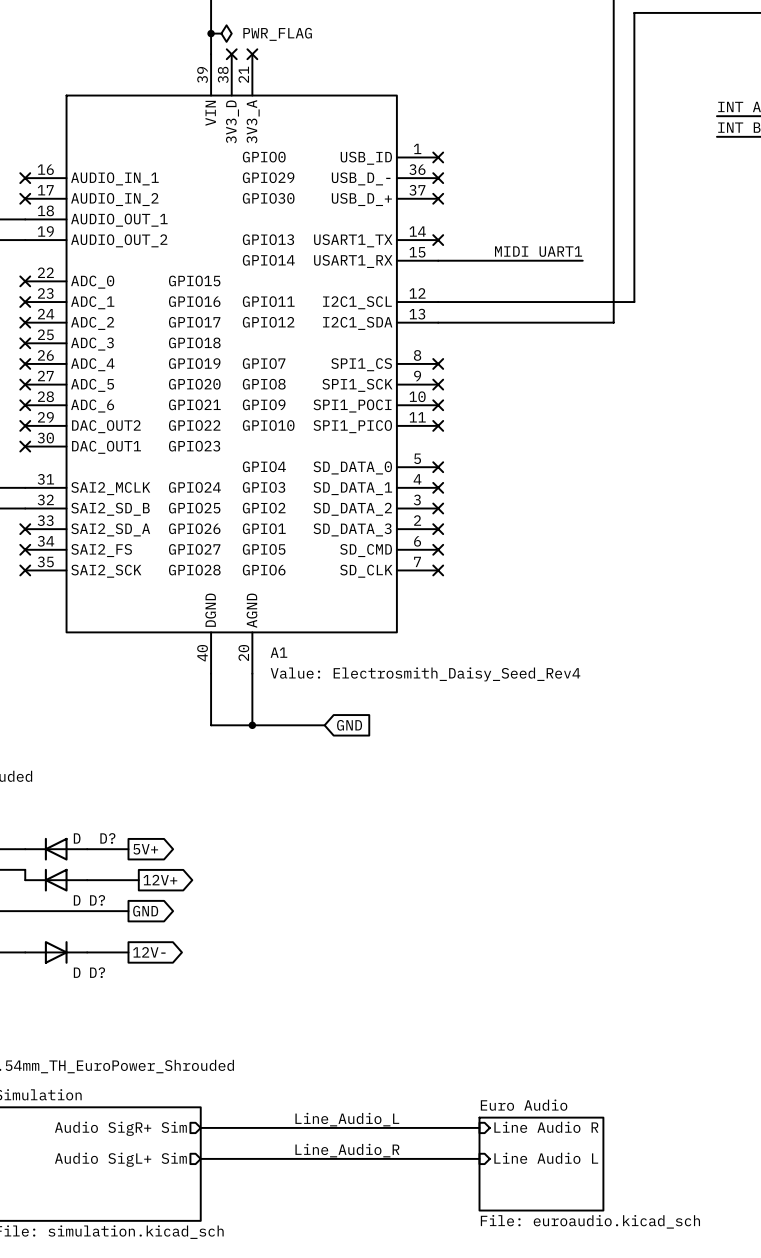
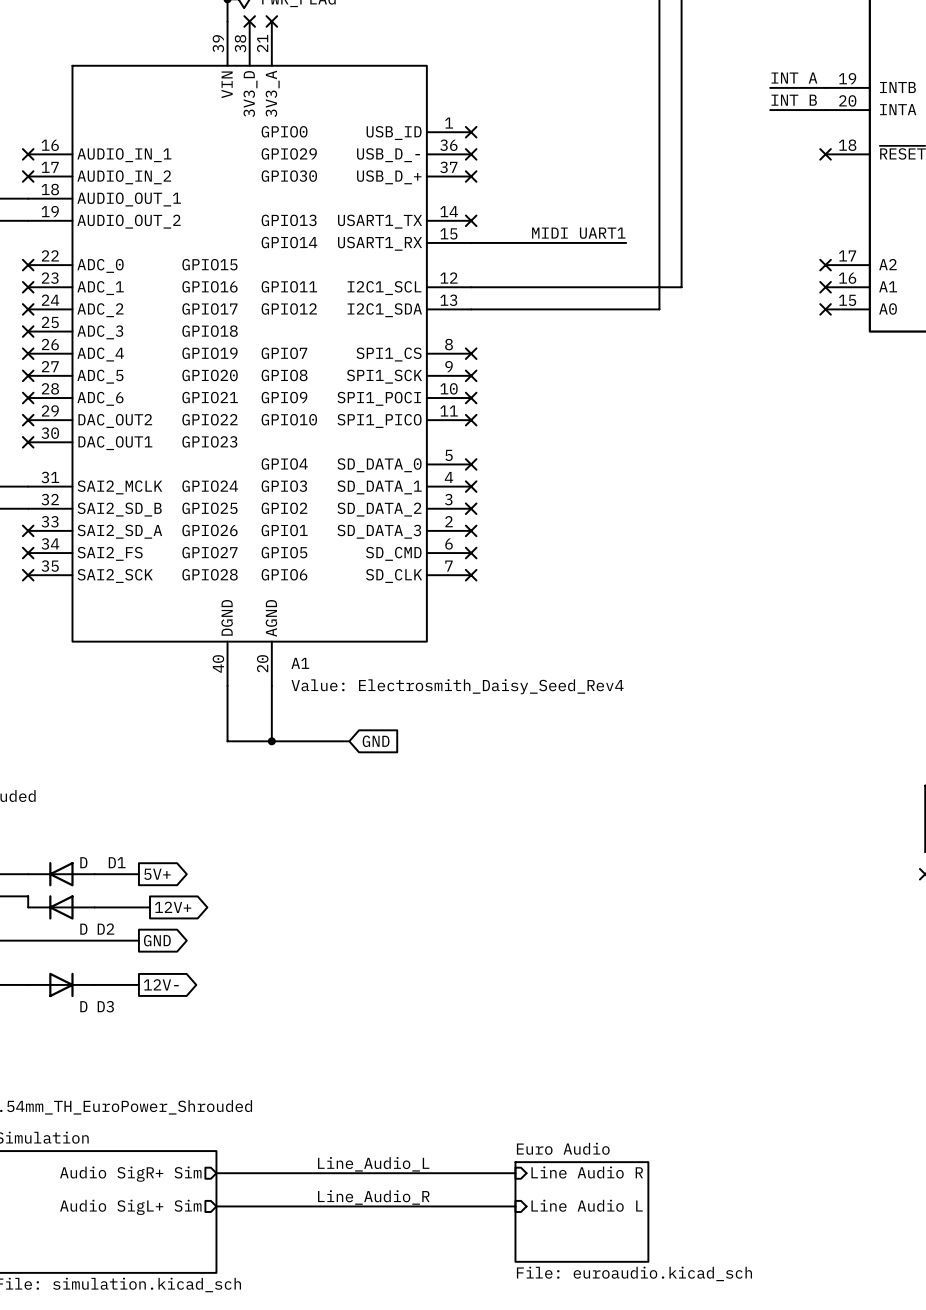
D? name: D? (107, 838) -> D1 (117, 862)
D? name: D? (97, 900) -> D2 (105, 929)
D? name: D? (97, 972) -> D3 (105, 1006)

